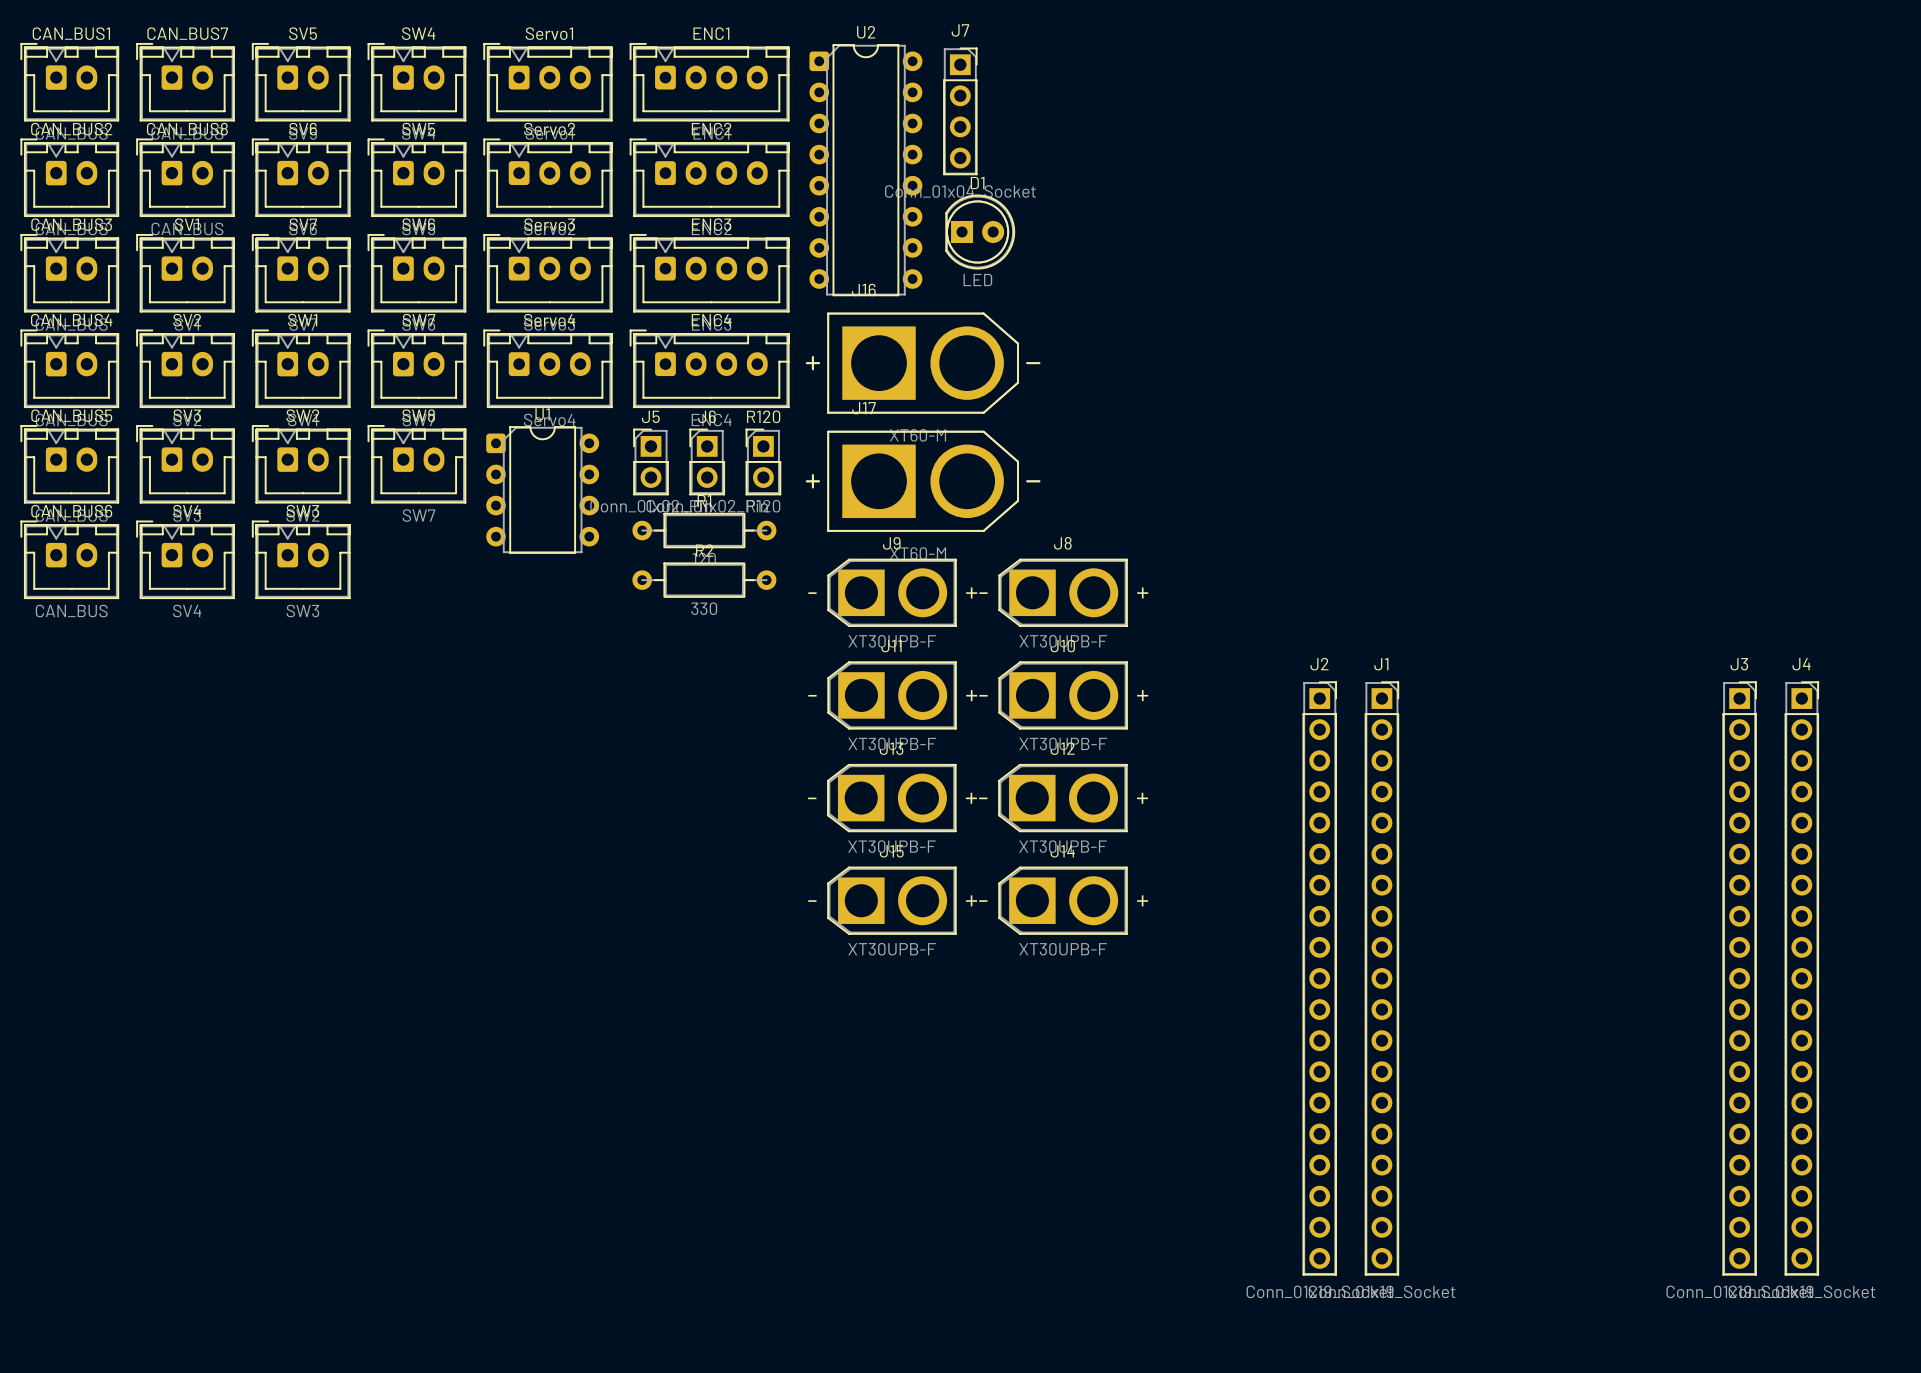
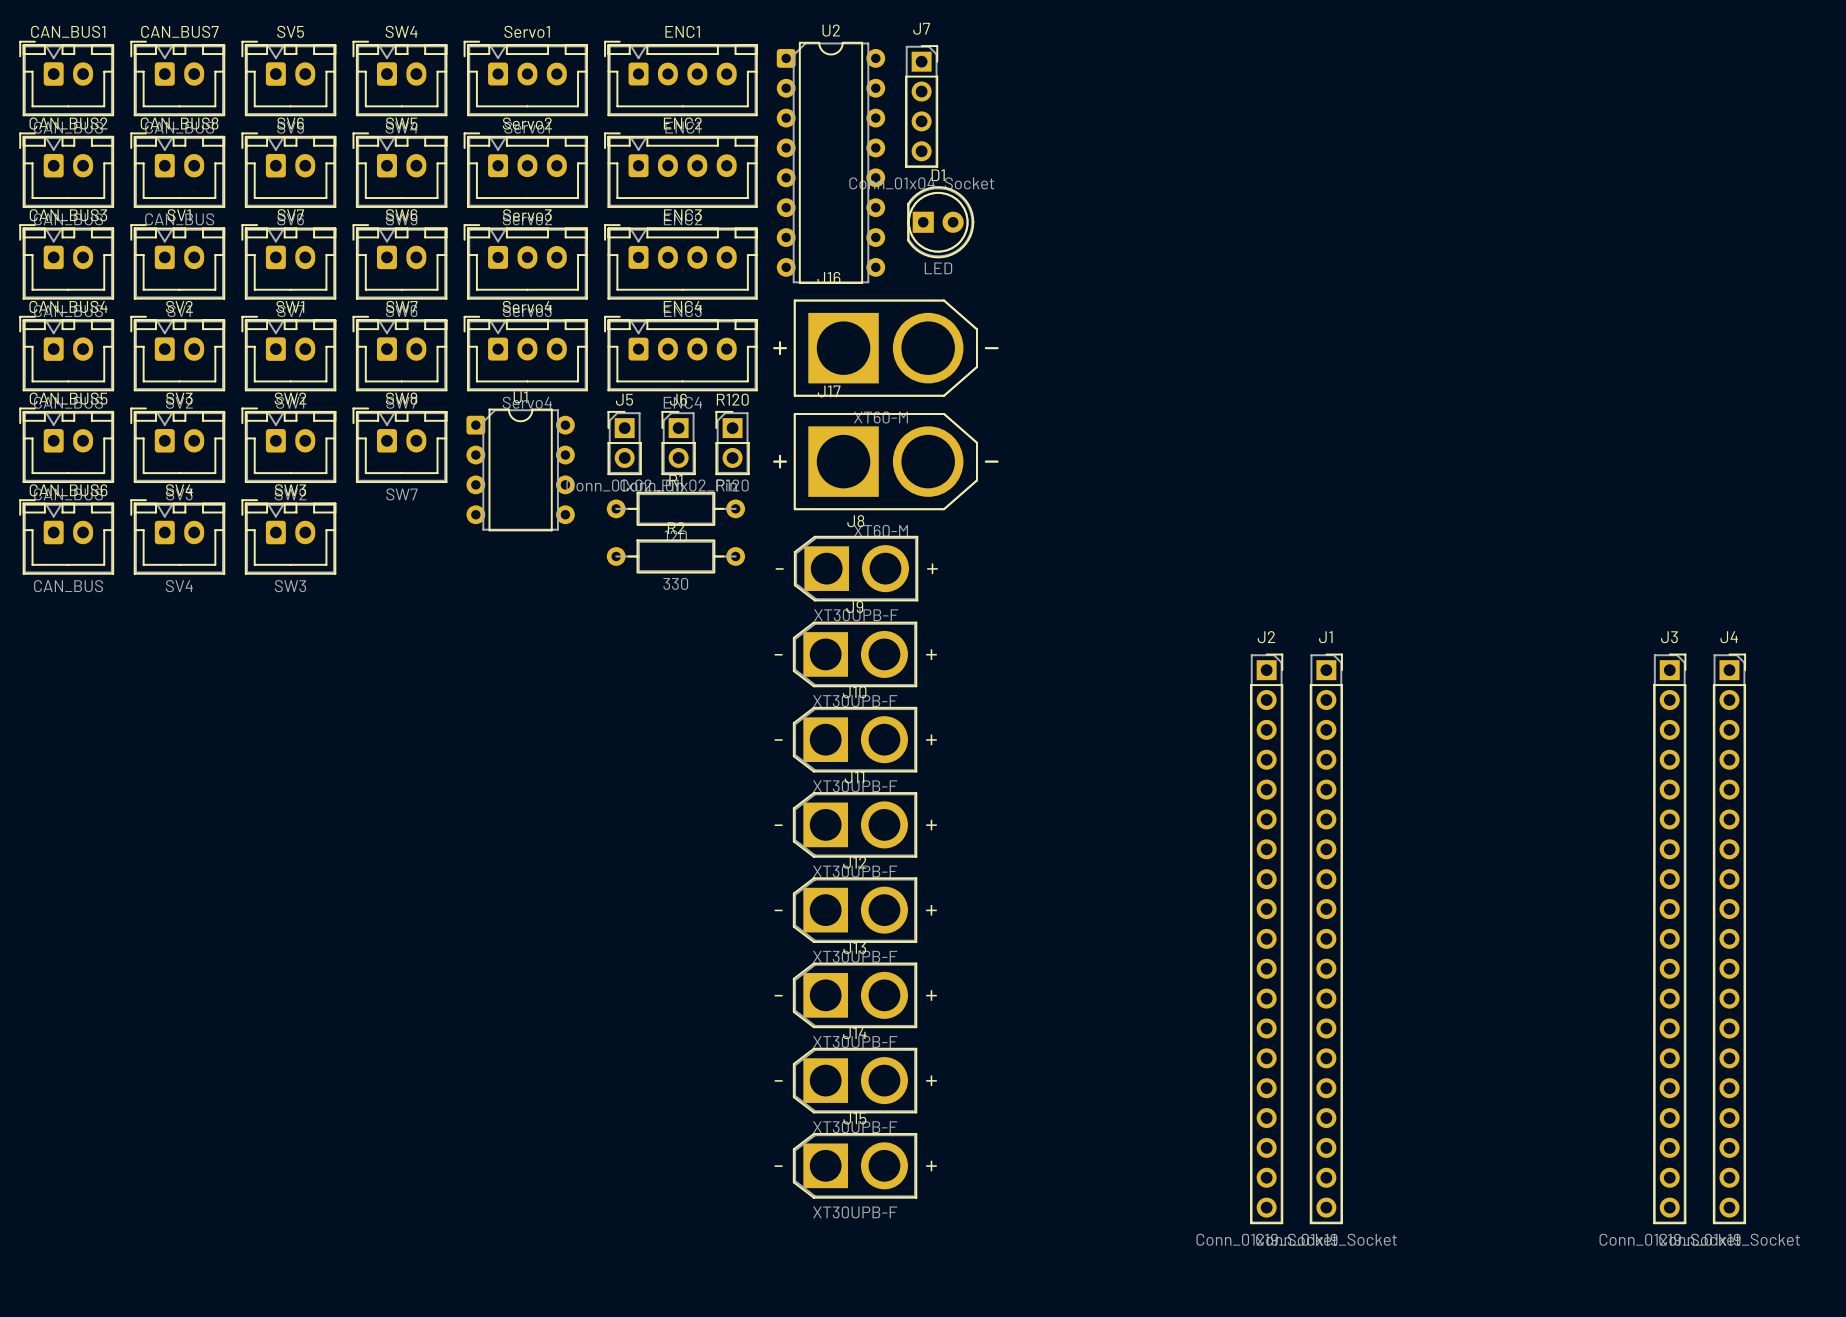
J9 name: J9 (891, 543) -> J8 (855, 521)
J8: XT30UPB-F (1063, 592) -> none
J9: none -> XT30UPB-F (855, 654)
J11 position: (892, 695) -> (855, 824)
J10 position: (1063, 695) -> (855, 739)
J13 position: (891, 798) -> (855, 995)
J12 position: (1062, 798) -> (855, 910)
J15 position: (891, 900) -> (855, 1165)
J14 position: (1063, 900) -> (855, 1080)

